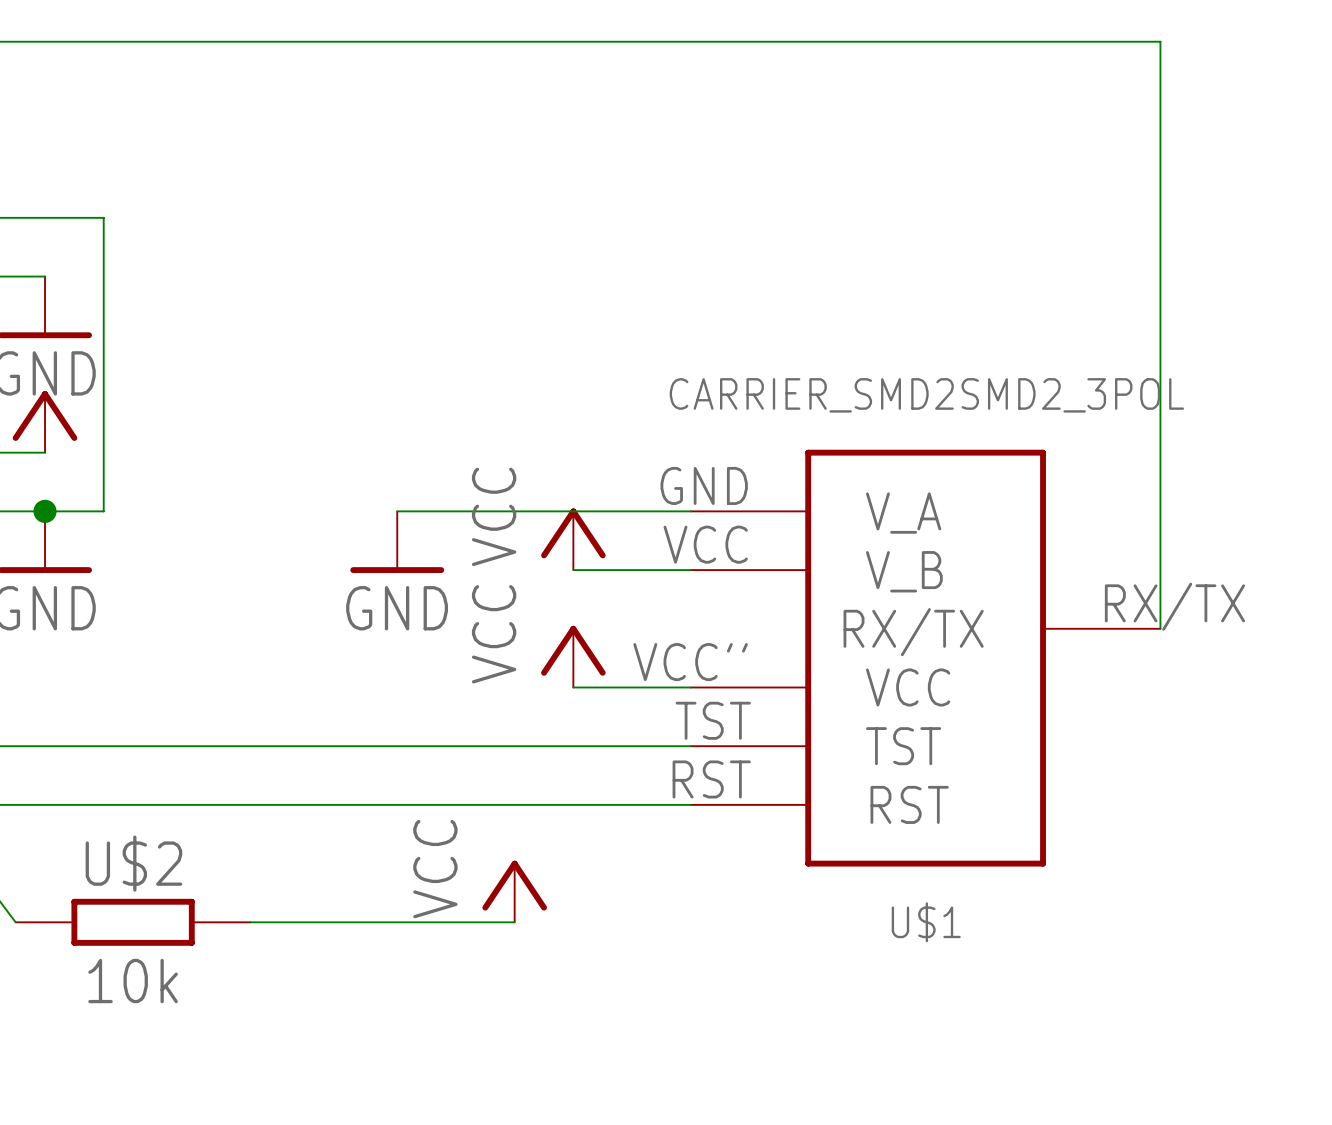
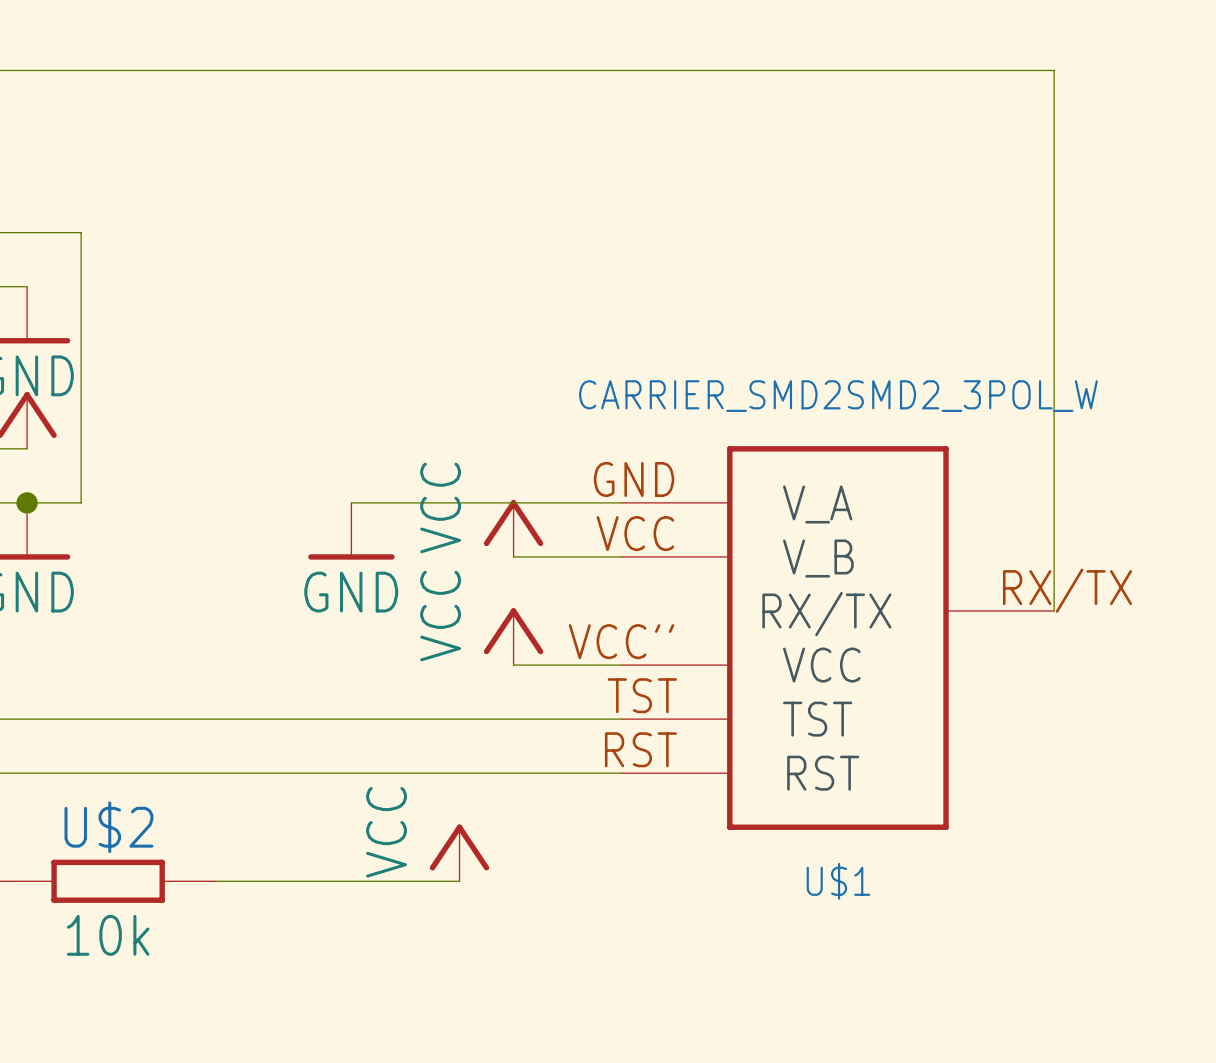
U$1 value: CARRIER_SMD2SMD2_3POL (926, 395) -> CARRIER_SMD2SMD2_3POL_W (838, 396)

